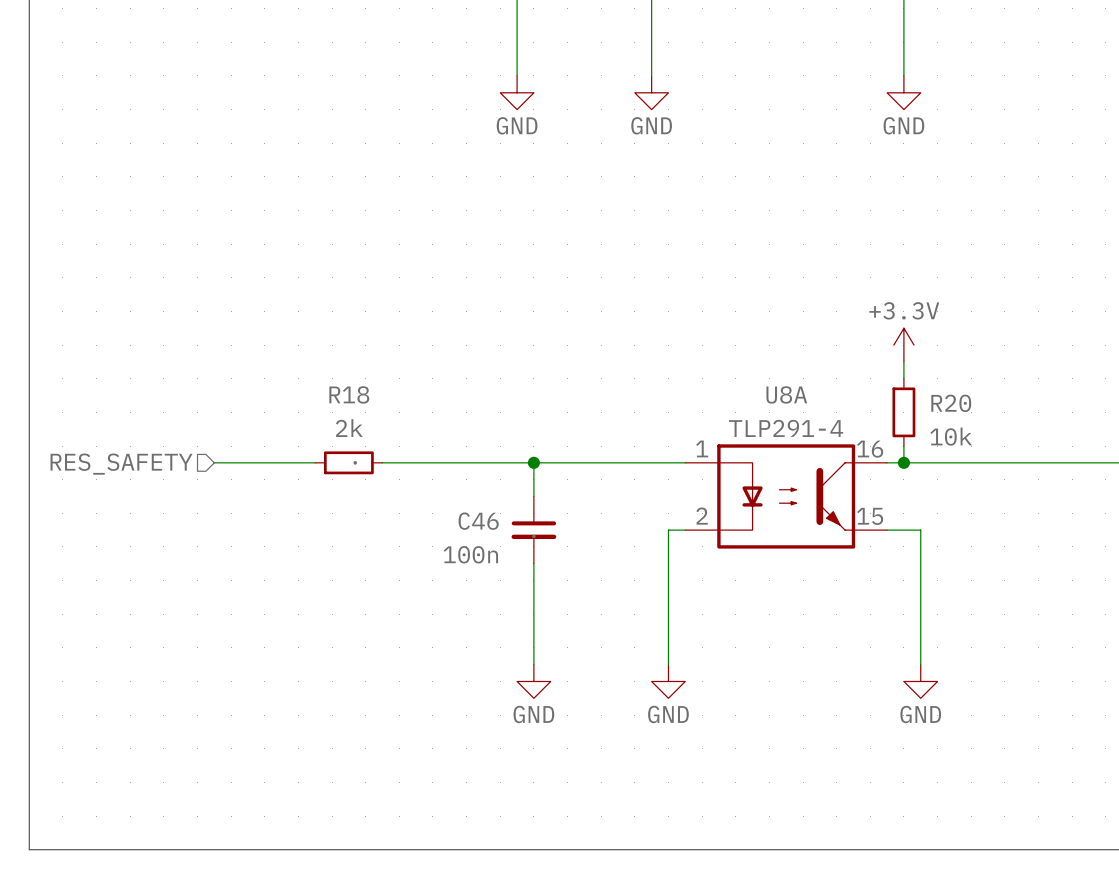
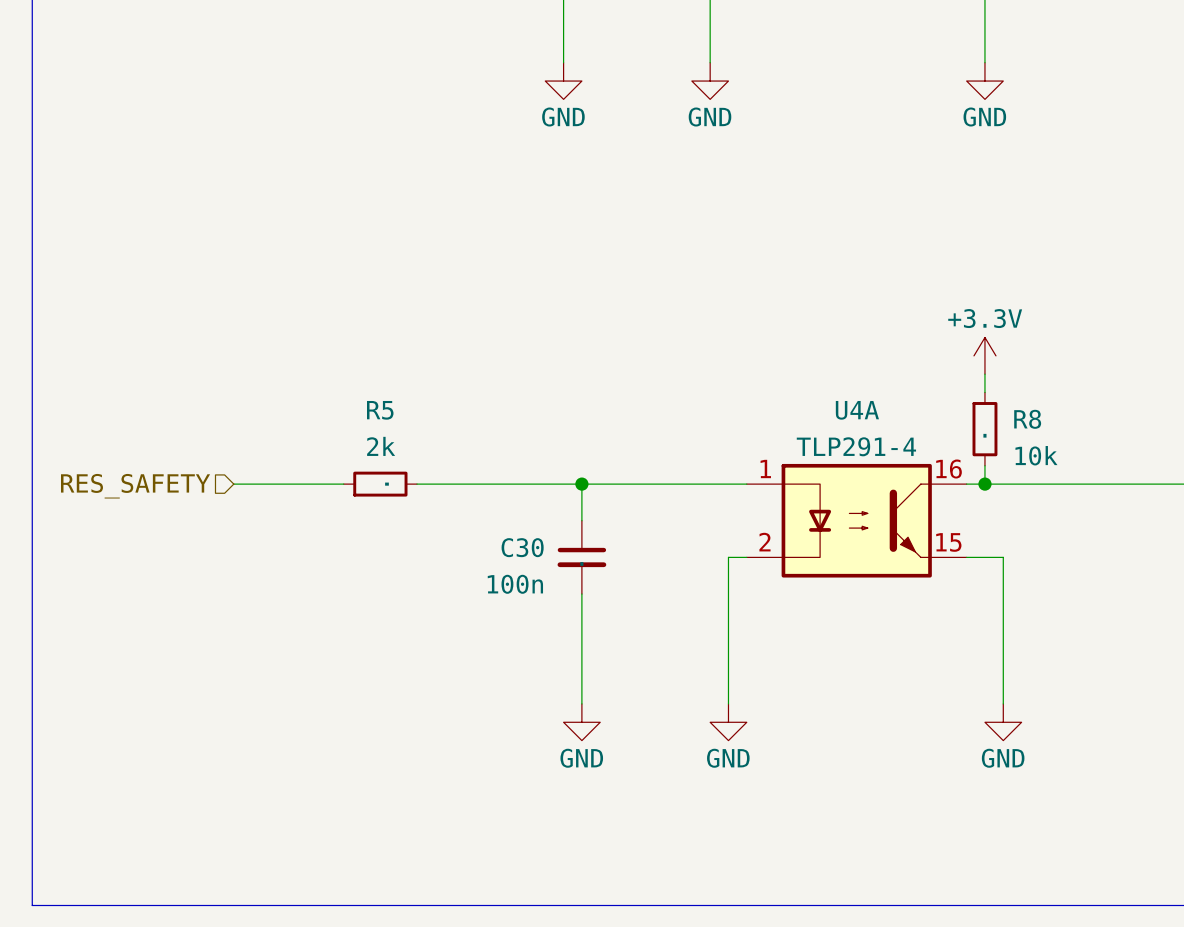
R18 name: R18 (349, 394) -> R5 (380, 410)
U8A name: U8A (786, 394) -> U4A (857, 410)
R20 name: R20 (951, 403) -> R8 (1027, 419)
R20 text: none -> . (984, 435)
C46 name: C46 (478, 521) -> C30 (522, 547)

